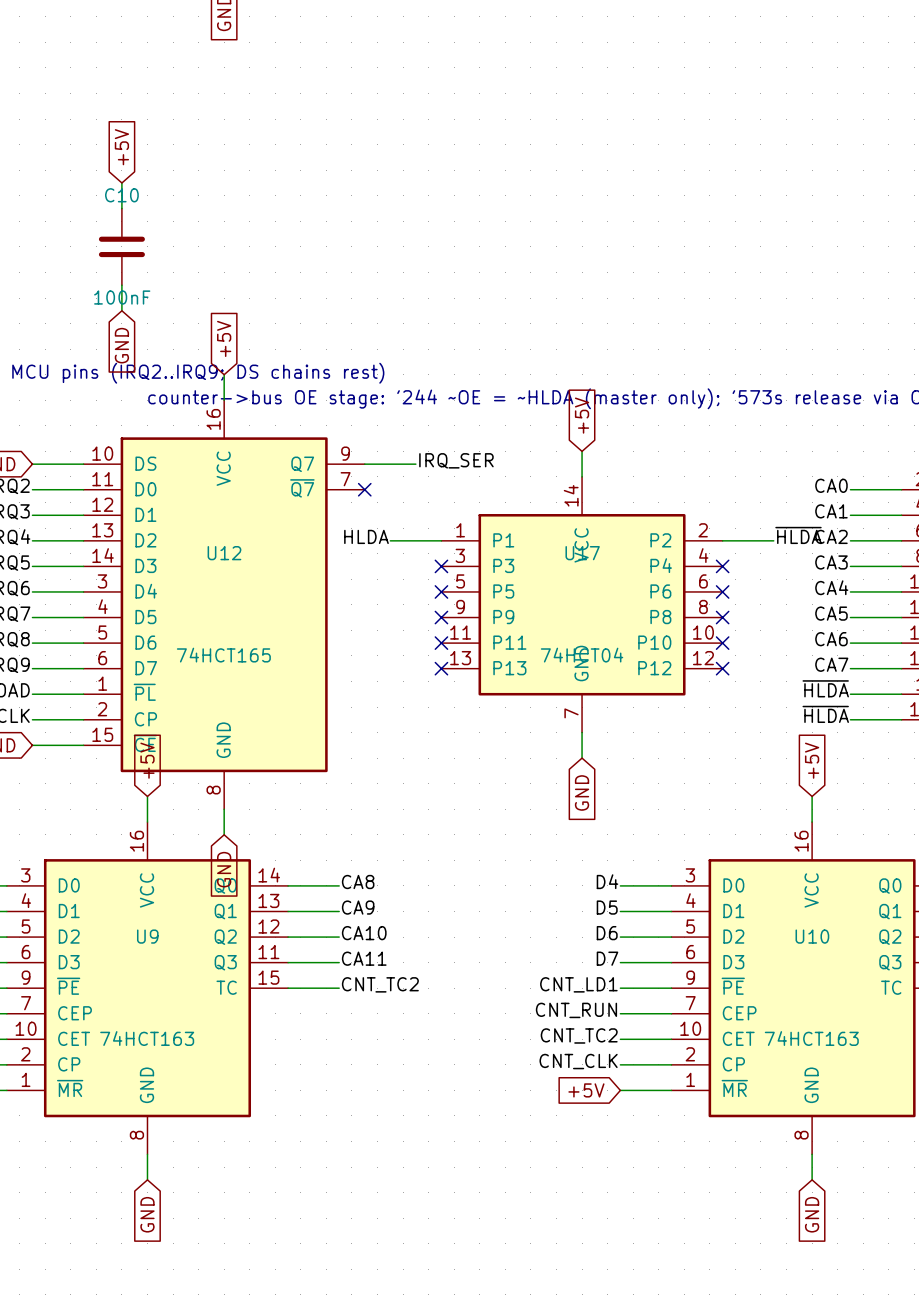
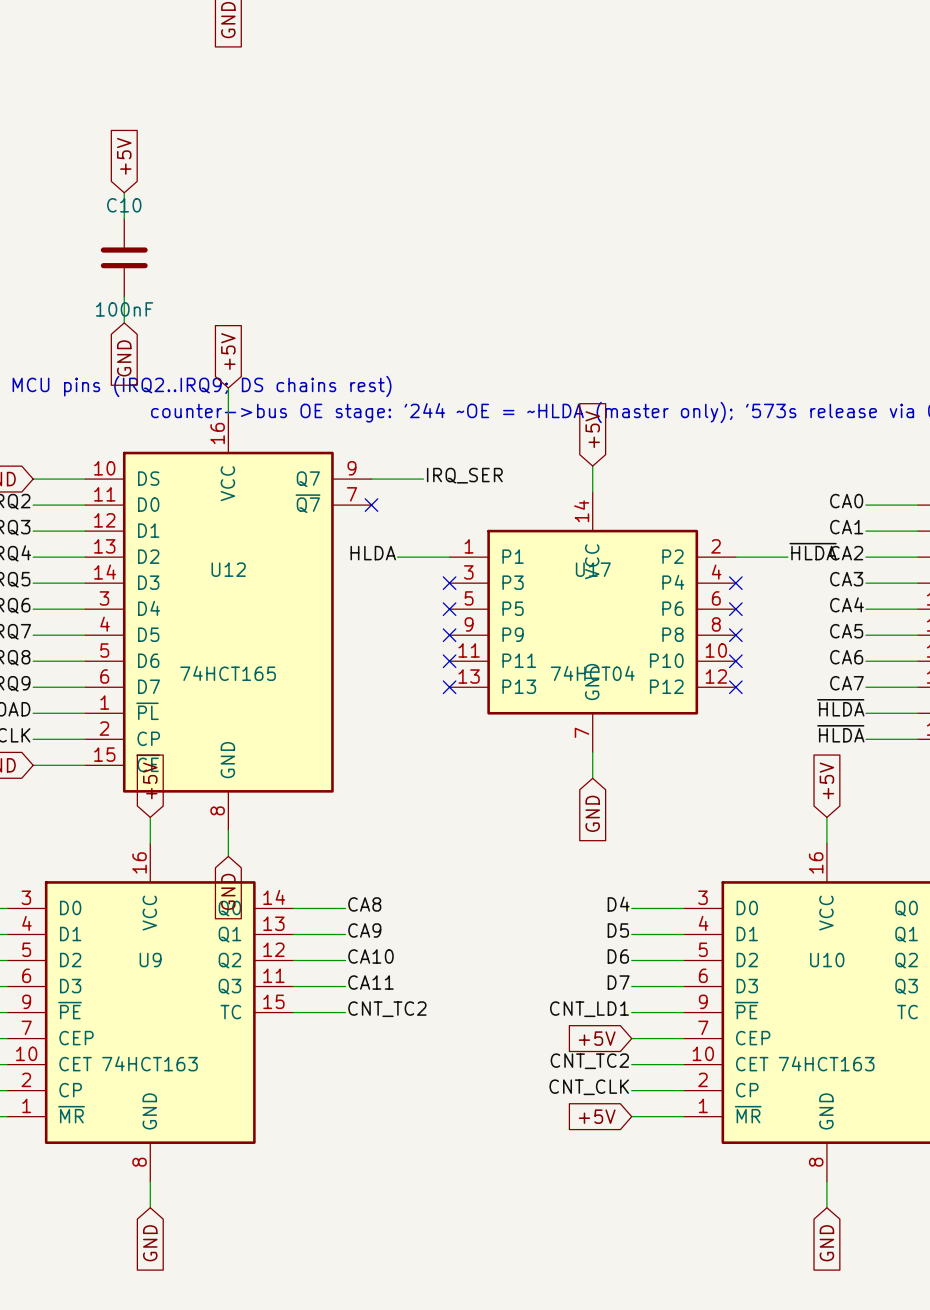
label: CNT_RUN (576, 1010) -> none
global label: none -> +5V (597, 1038)

